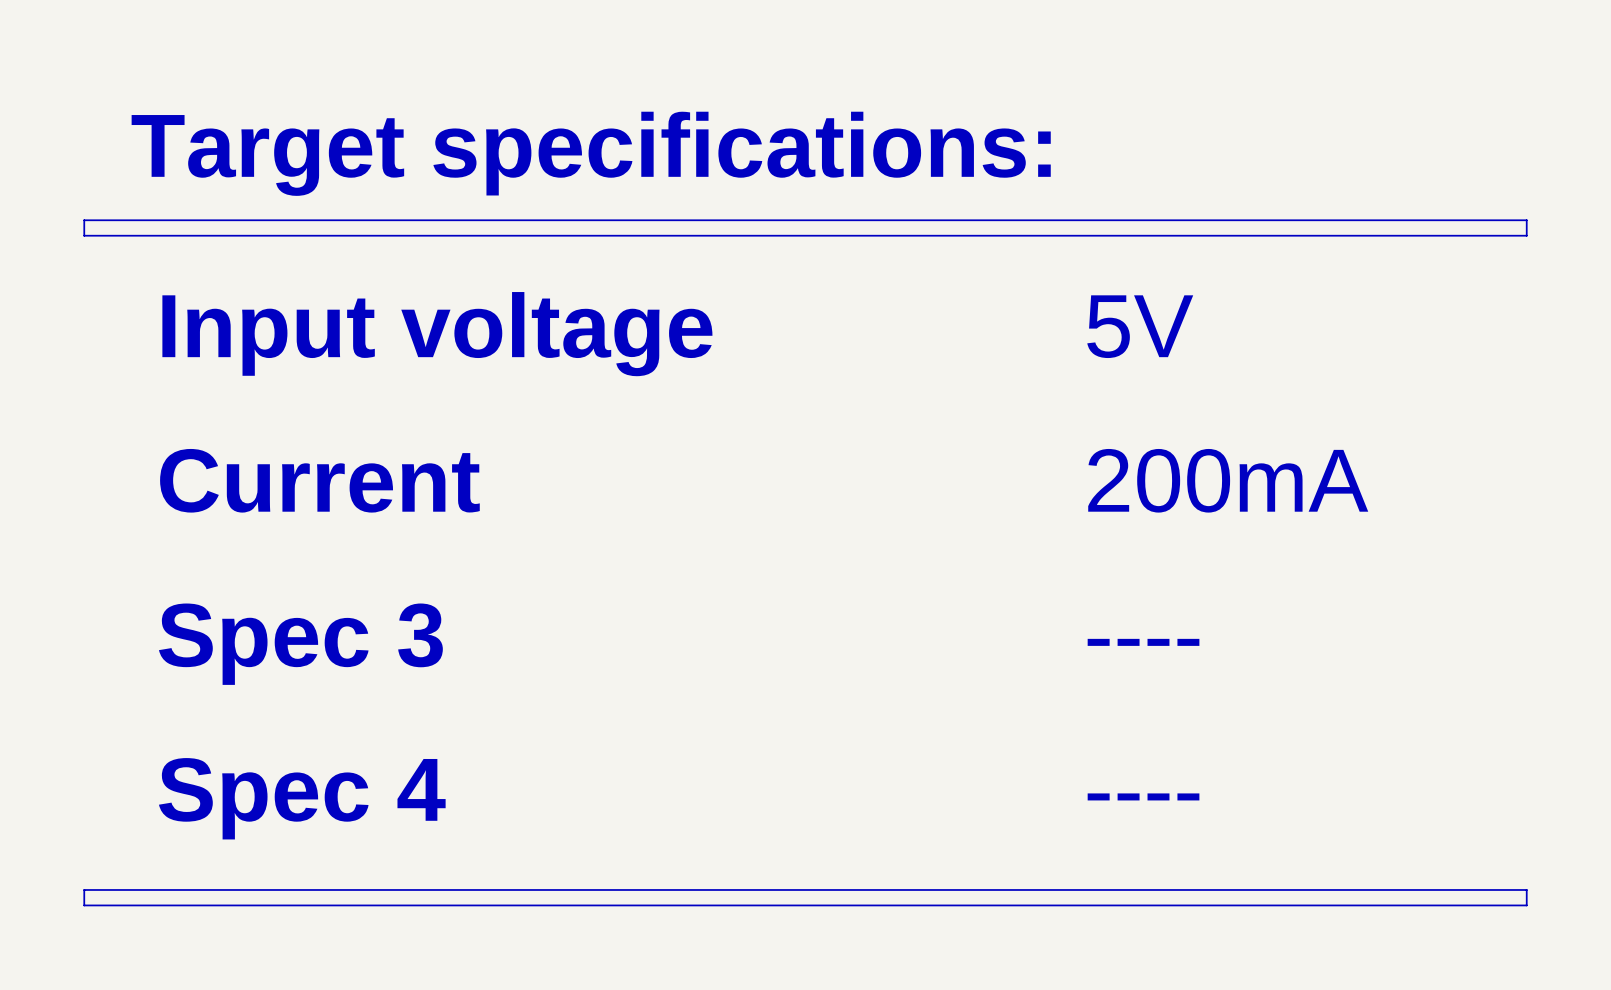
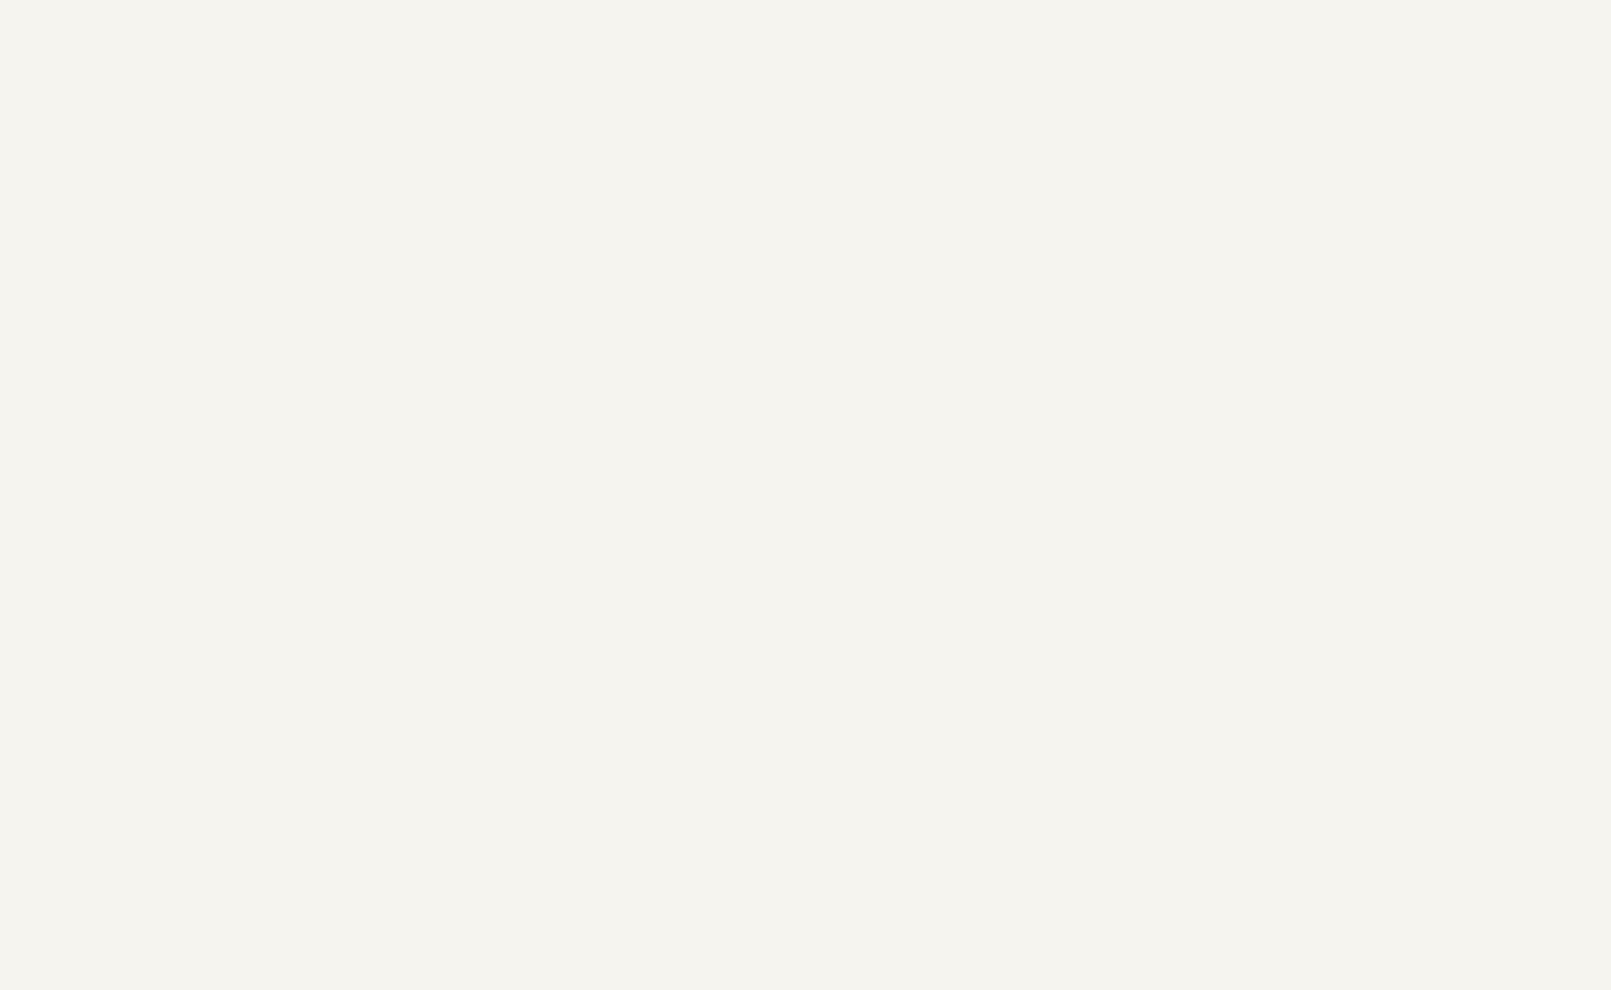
text: Target specifications: (591, 153) -> none
line: (84, 220) (84, 235) (1526, 235) (1526, 220) (84, 220) -> none
text: 5V (1140, 326) -> none
text: Input voltage (437, 334) -> none
text: Current (319, 480) -> none
text: 200mA (1228, 480) -> none
text: ---- (1143, 642) -> none
text: Spec 3 (300, 644) -> none
text: ---- (1143, 796) -> none
text: Spec 4 (302, 798) -> none
line: (84, 889) (1526, 889) (1526, 905) (84, 905) (84, 889) -> none

